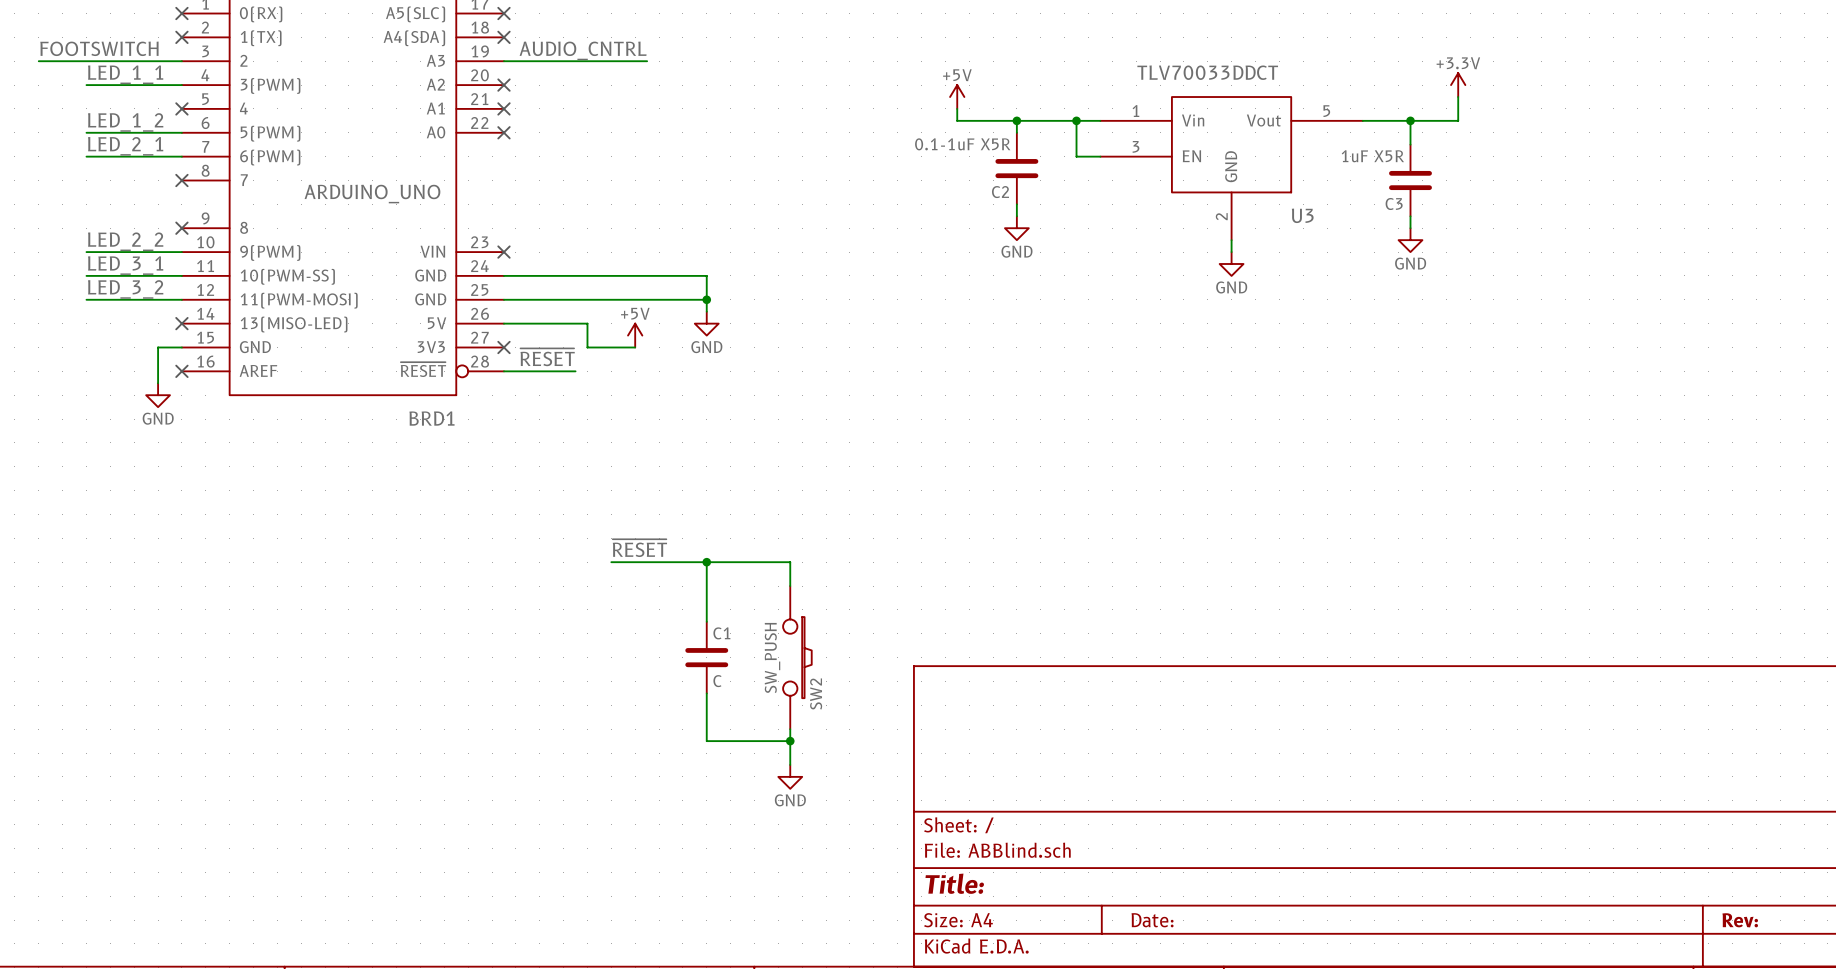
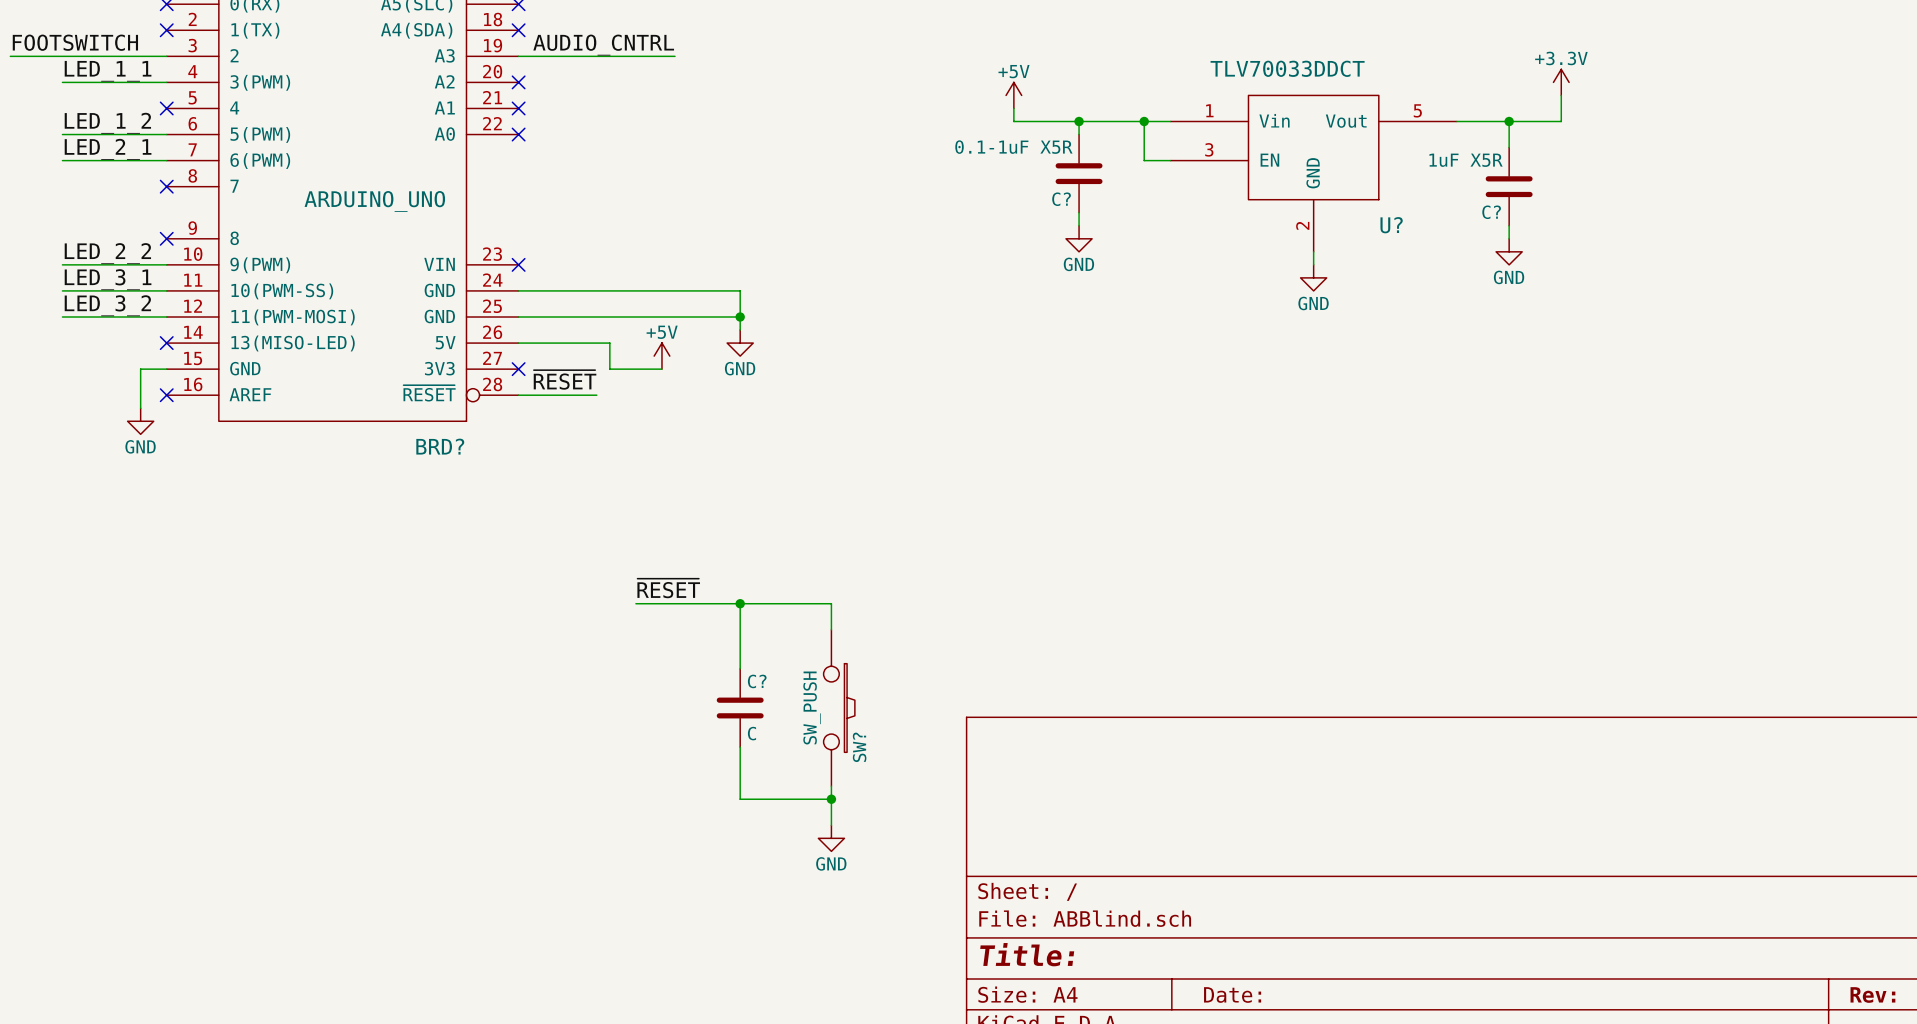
C2 name: C2 (1000, 192) -> C? (1061, 199)
C3 name: C3 (1394, 203) -> C? (1491, 212)
U3 name: U3 (1302, 215) -> U? (1391, 225)
BRD1 name: BRD1 (431, 418) -> BRD? (440, 446)
C1 name: C1 (721, 633) -> C? (757, 681)
SW2 name: SW2 (816, 694) -> SW? (859, 747)

